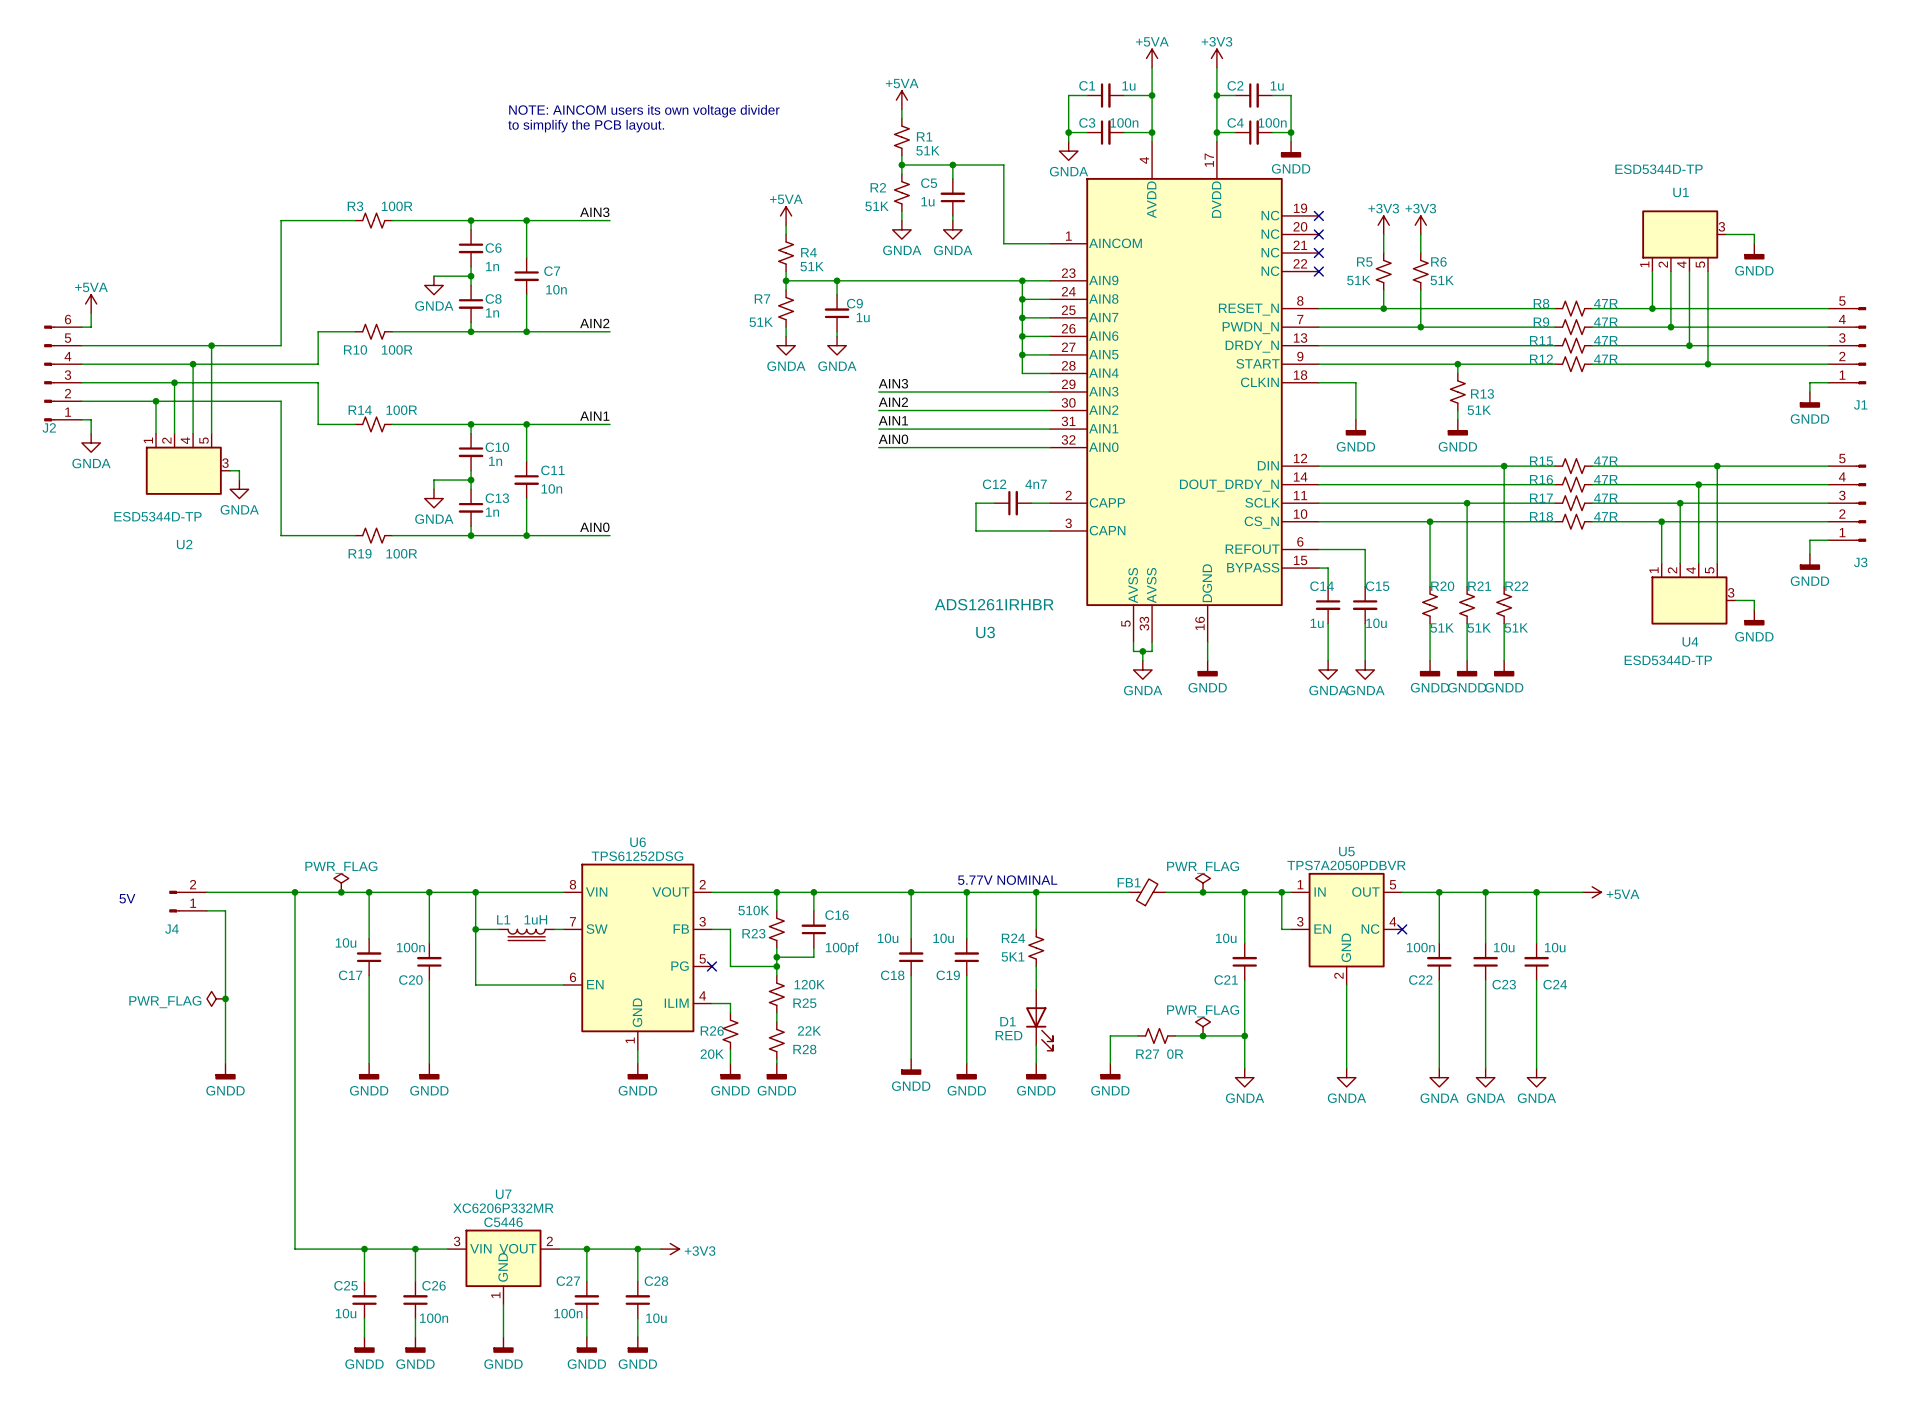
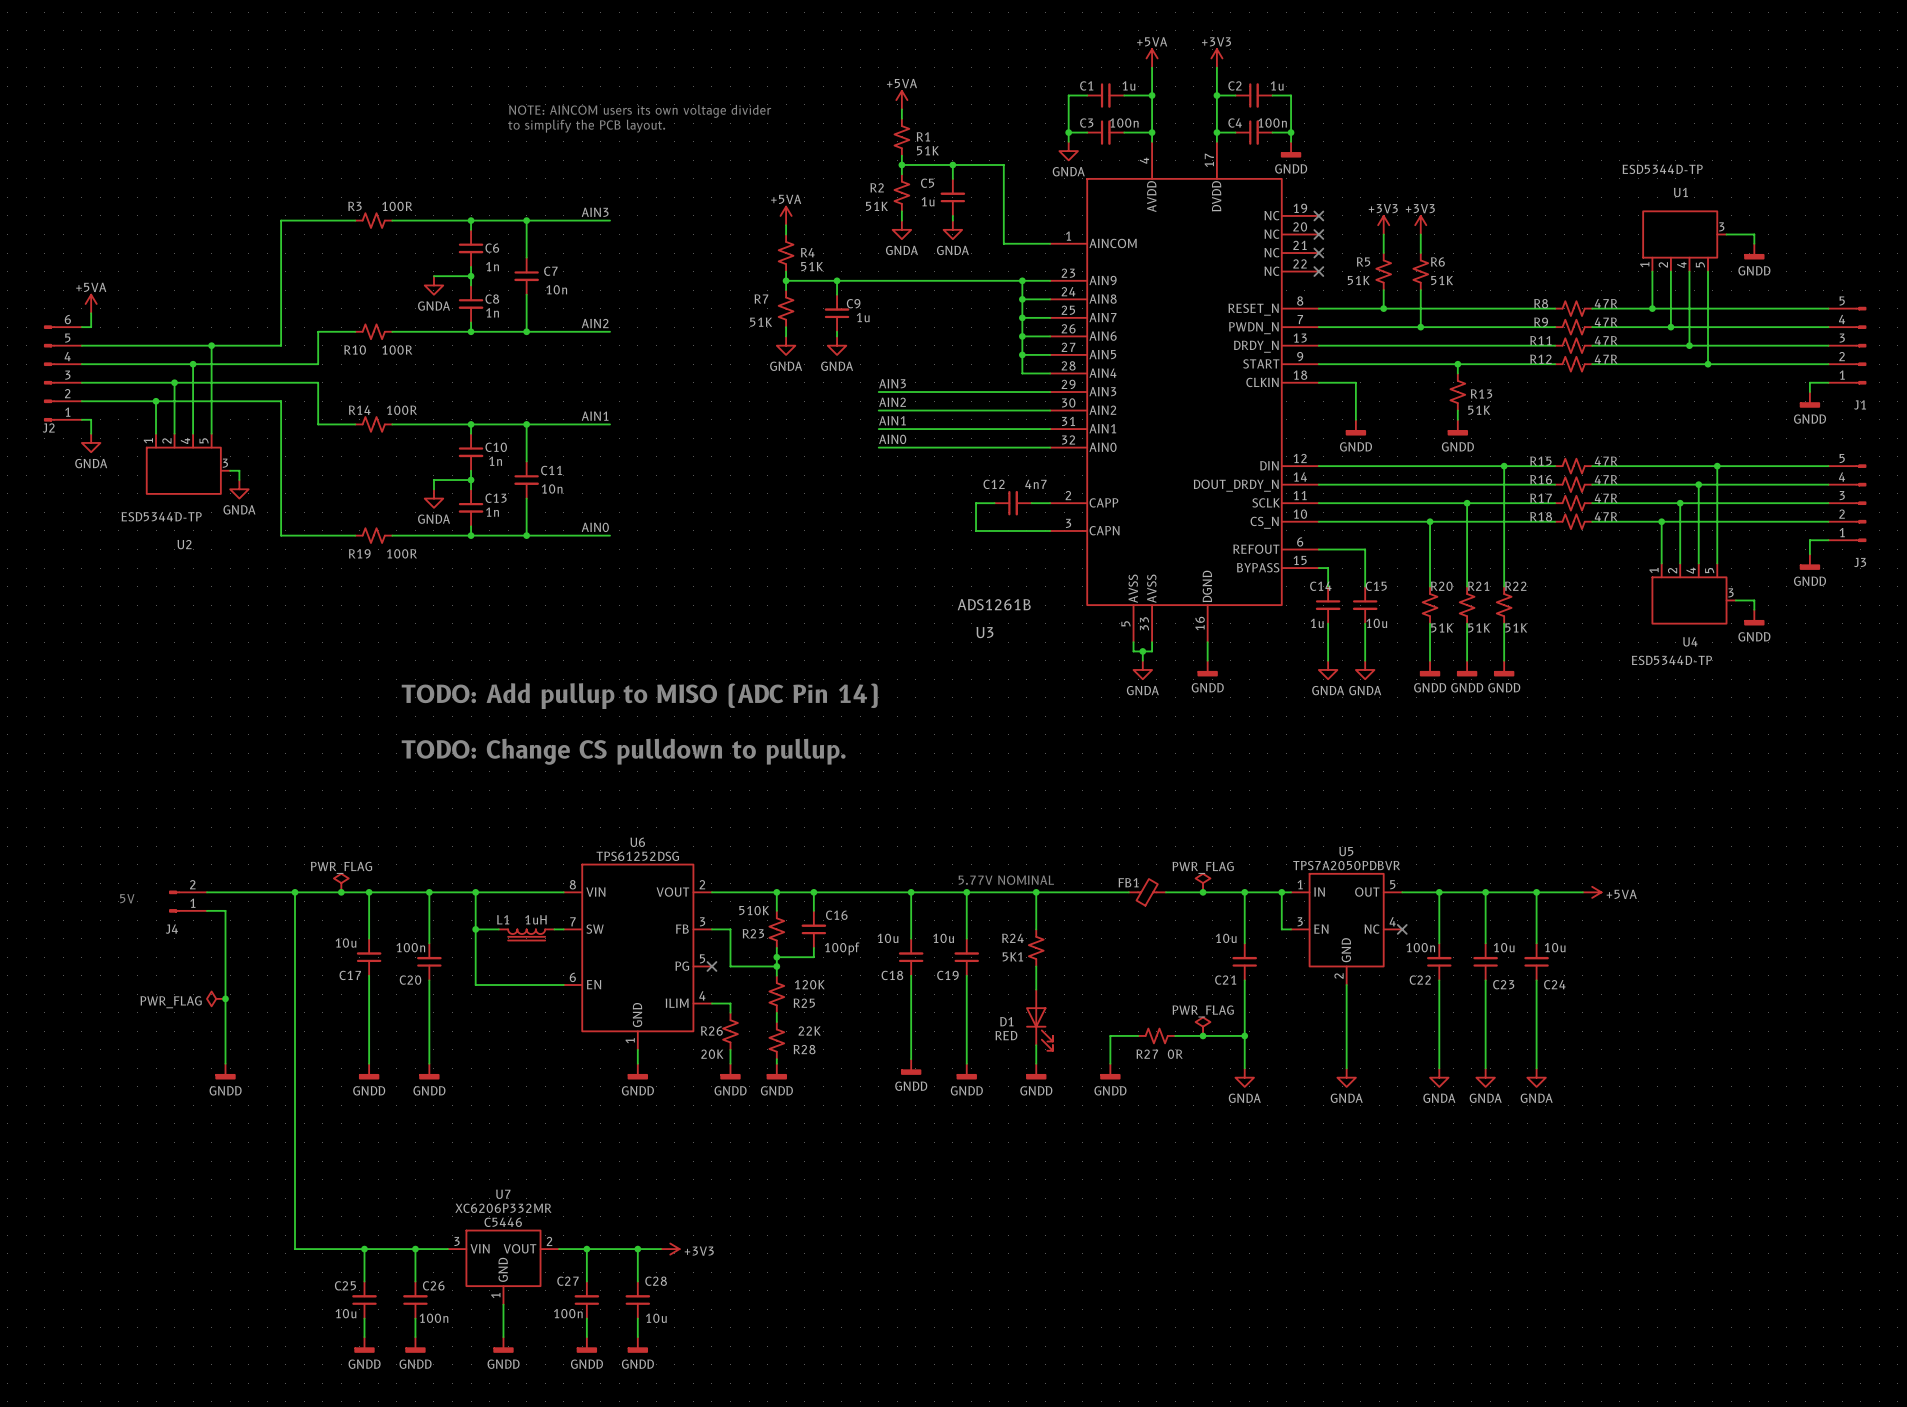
U3 value: ADS1261IRHBR (994, 604) -> ADS1261B (994, 604)
text: none -> TODO: Add pullup to MISO (ADC Pin 14) (639, 696)
text: none -> TODO: Change CS pulldown to pullup. (623, 751)

